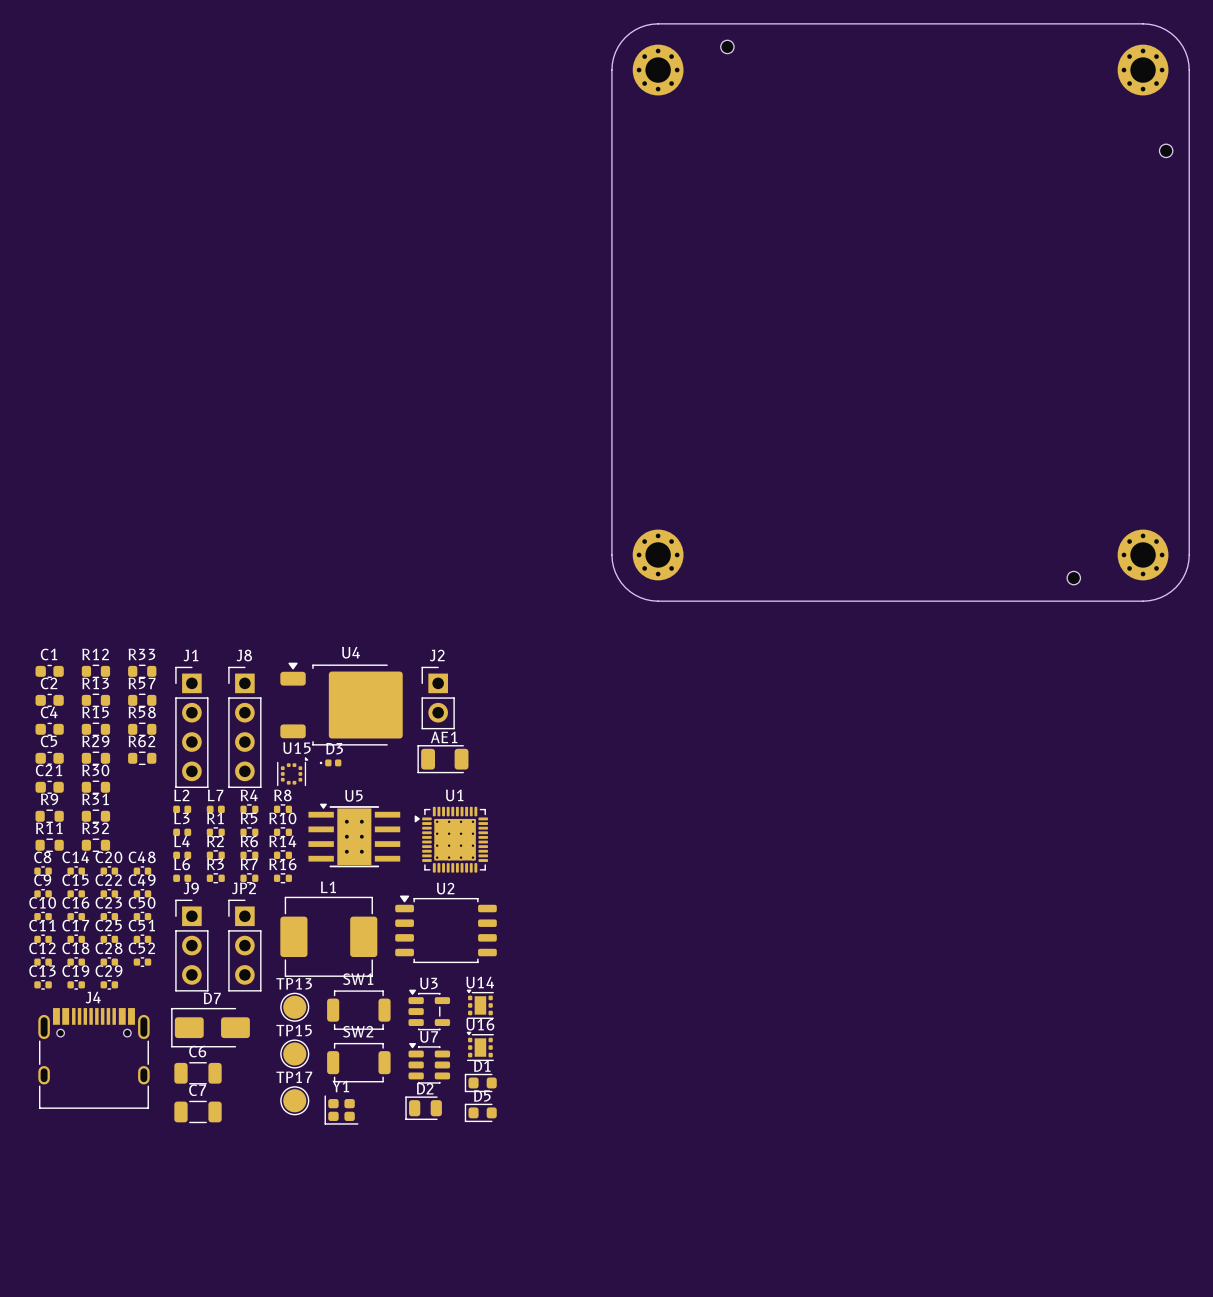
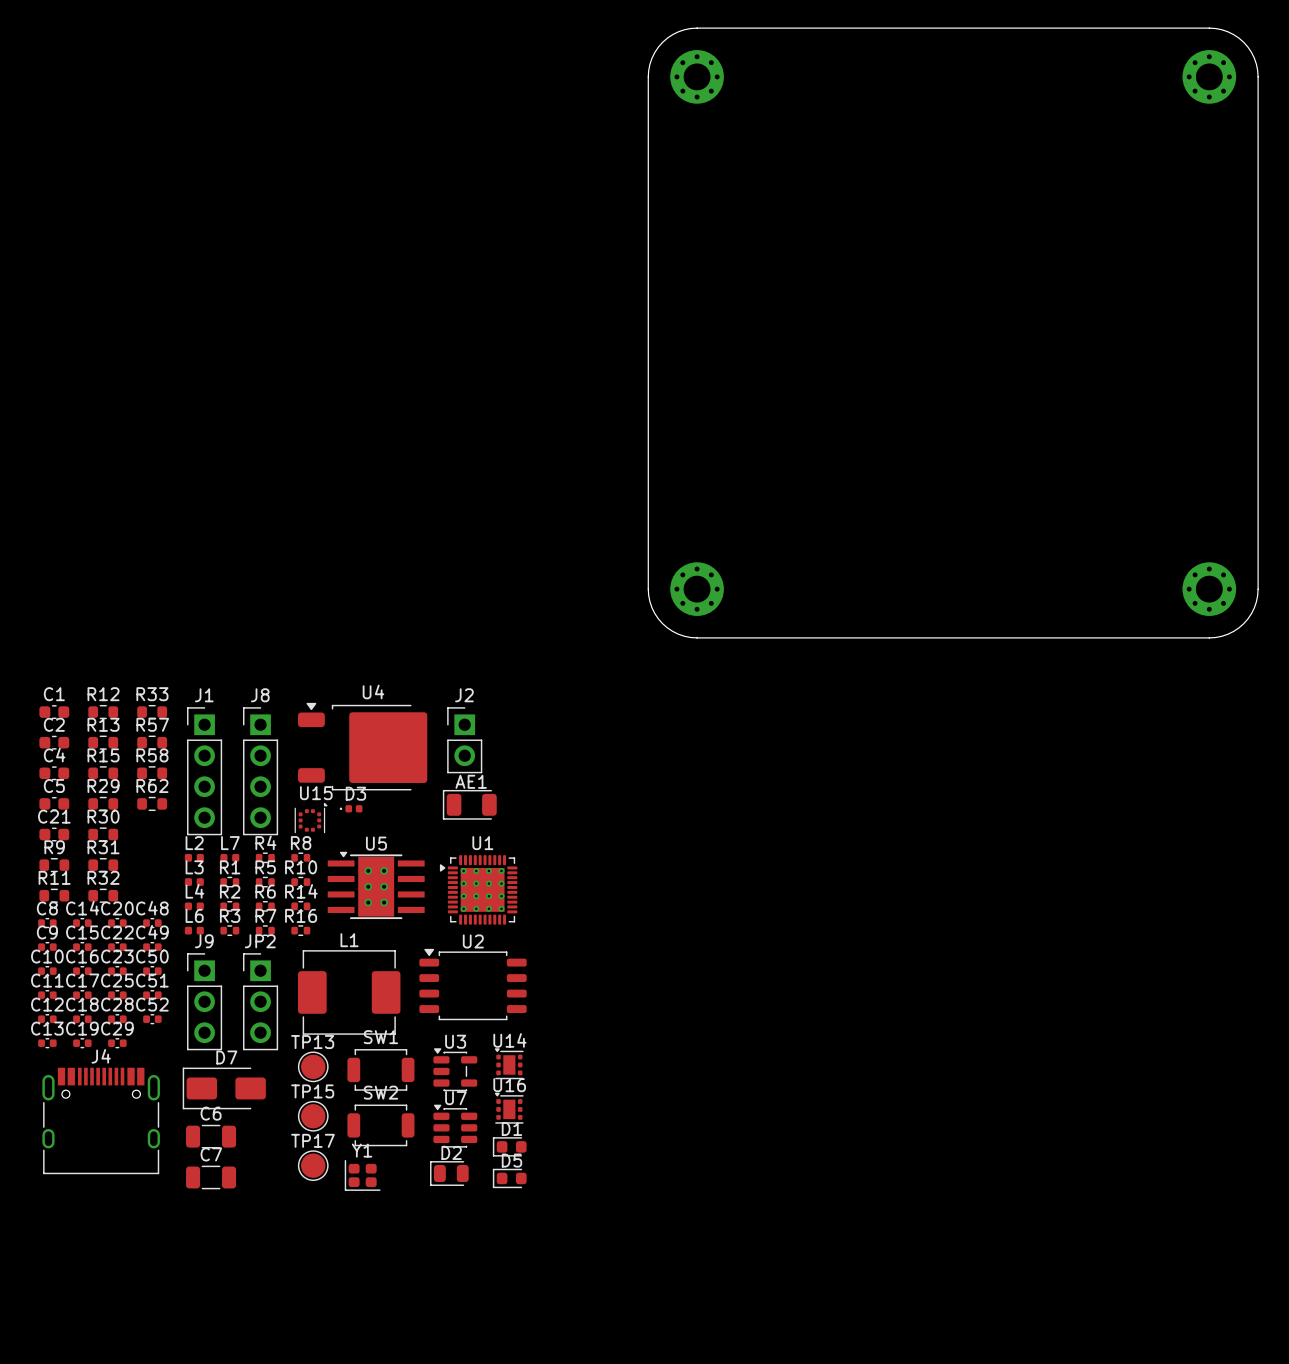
part: (727, 46) -> none
part: (1166, 150) -> none
part: (1073, 578) -> none

